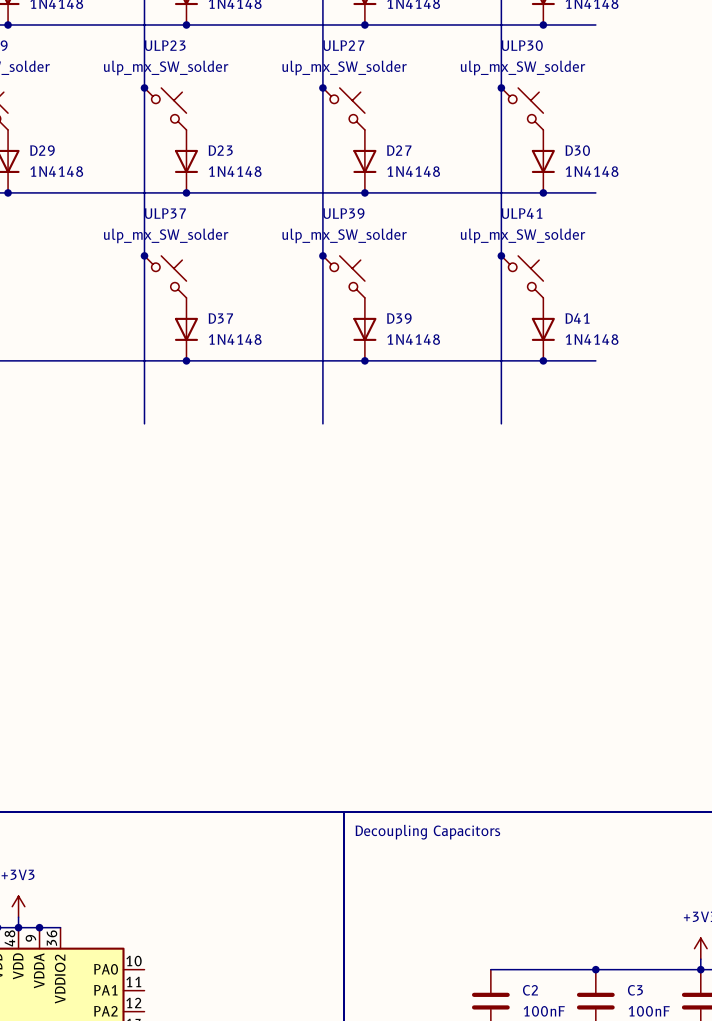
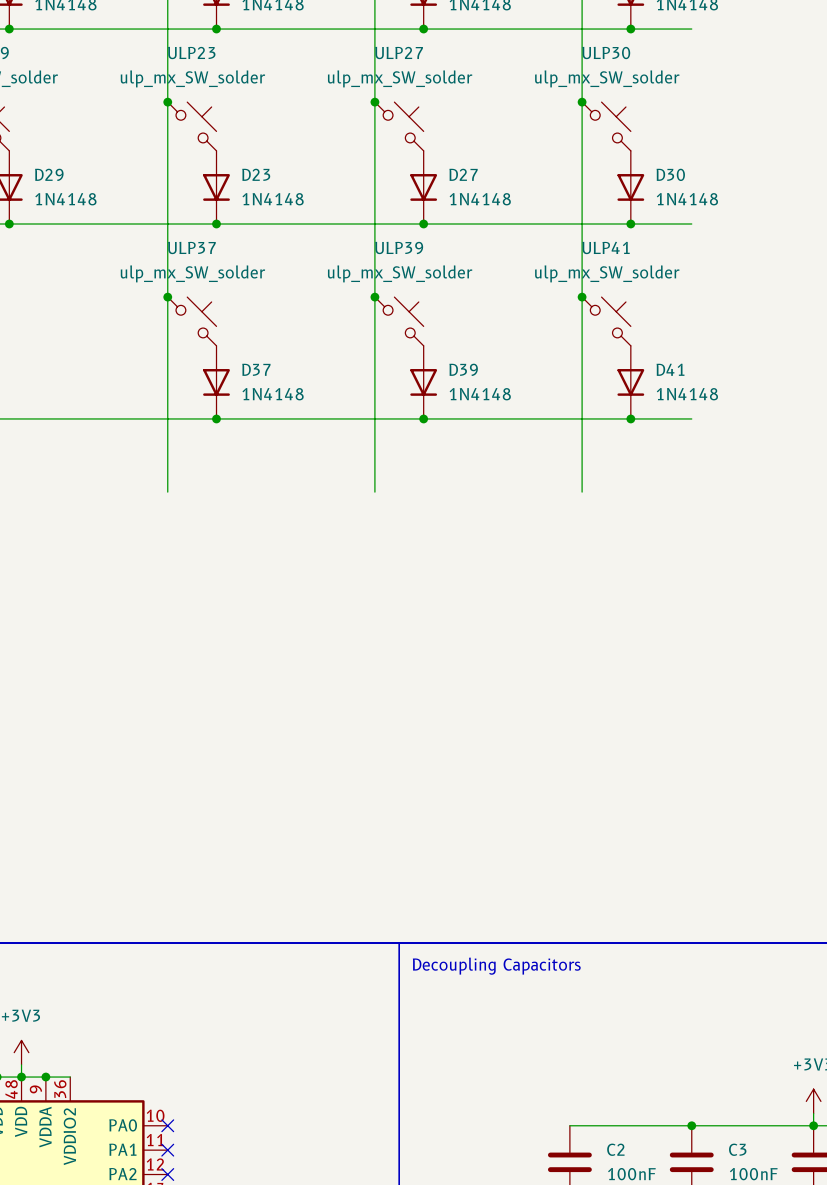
no-connect mark: none -> (167, 1125)
no-connect mark: none -> (167, 1150)
no-connect mark: none -> (167, 1174)

